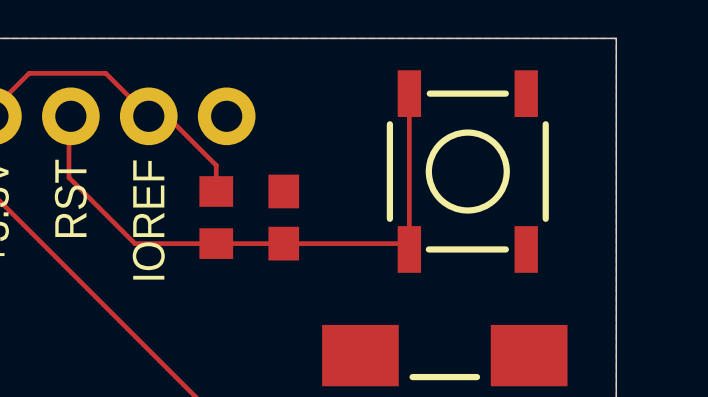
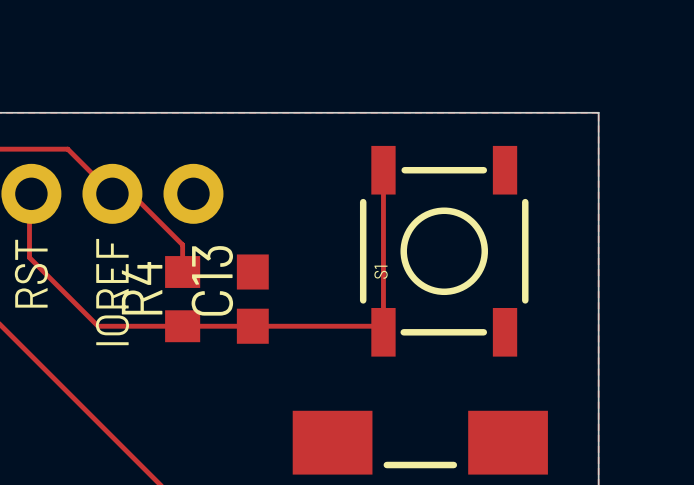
S1 name: none -> S1 (381, 272)
C13 name: none -> C13 (212, 280)
R4 name: none -> R4 (142, 288)

